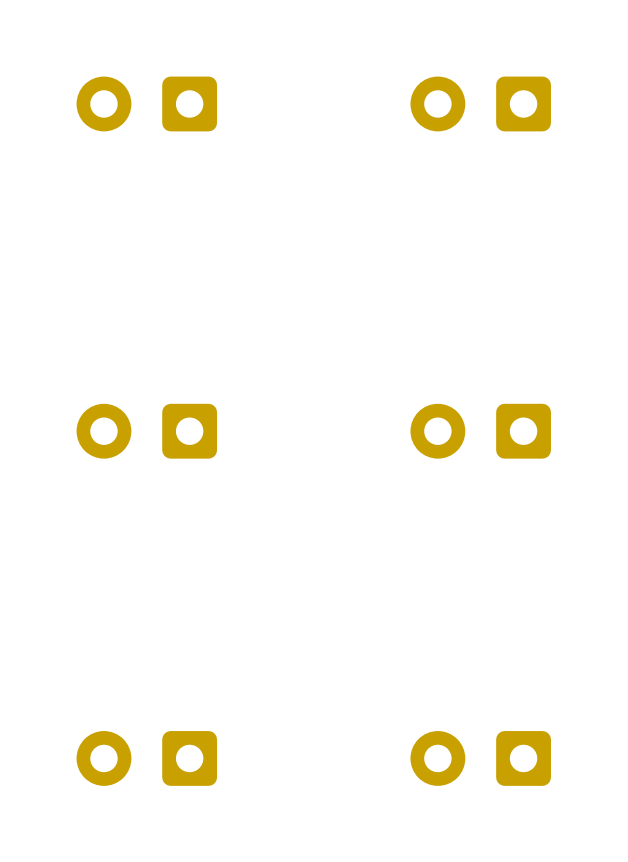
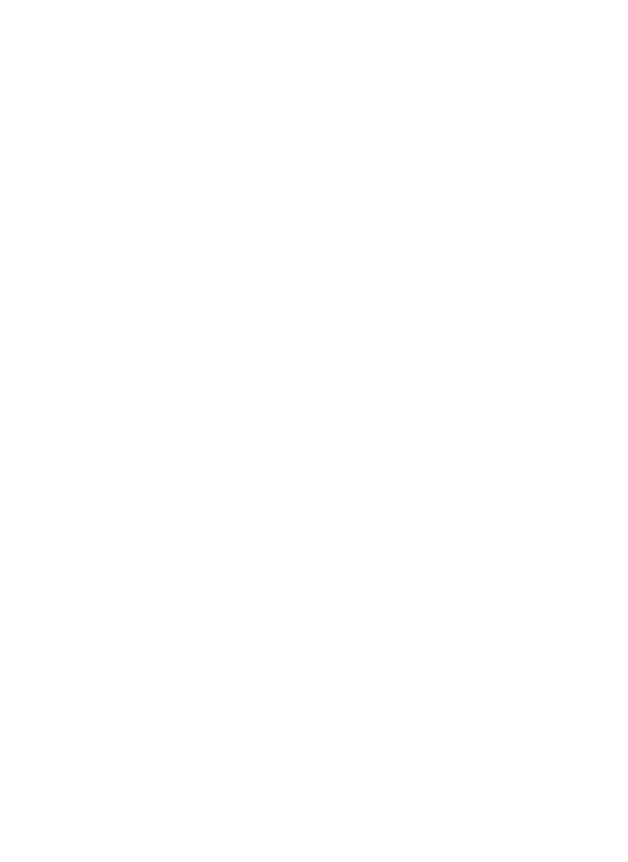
part: (146, 103) -> none
part: (480, 103) -> none
part: (146, 431) -> none
part: (480, 431) -> none
part: (146, 758) -> none
part: (480, 758) -> none

